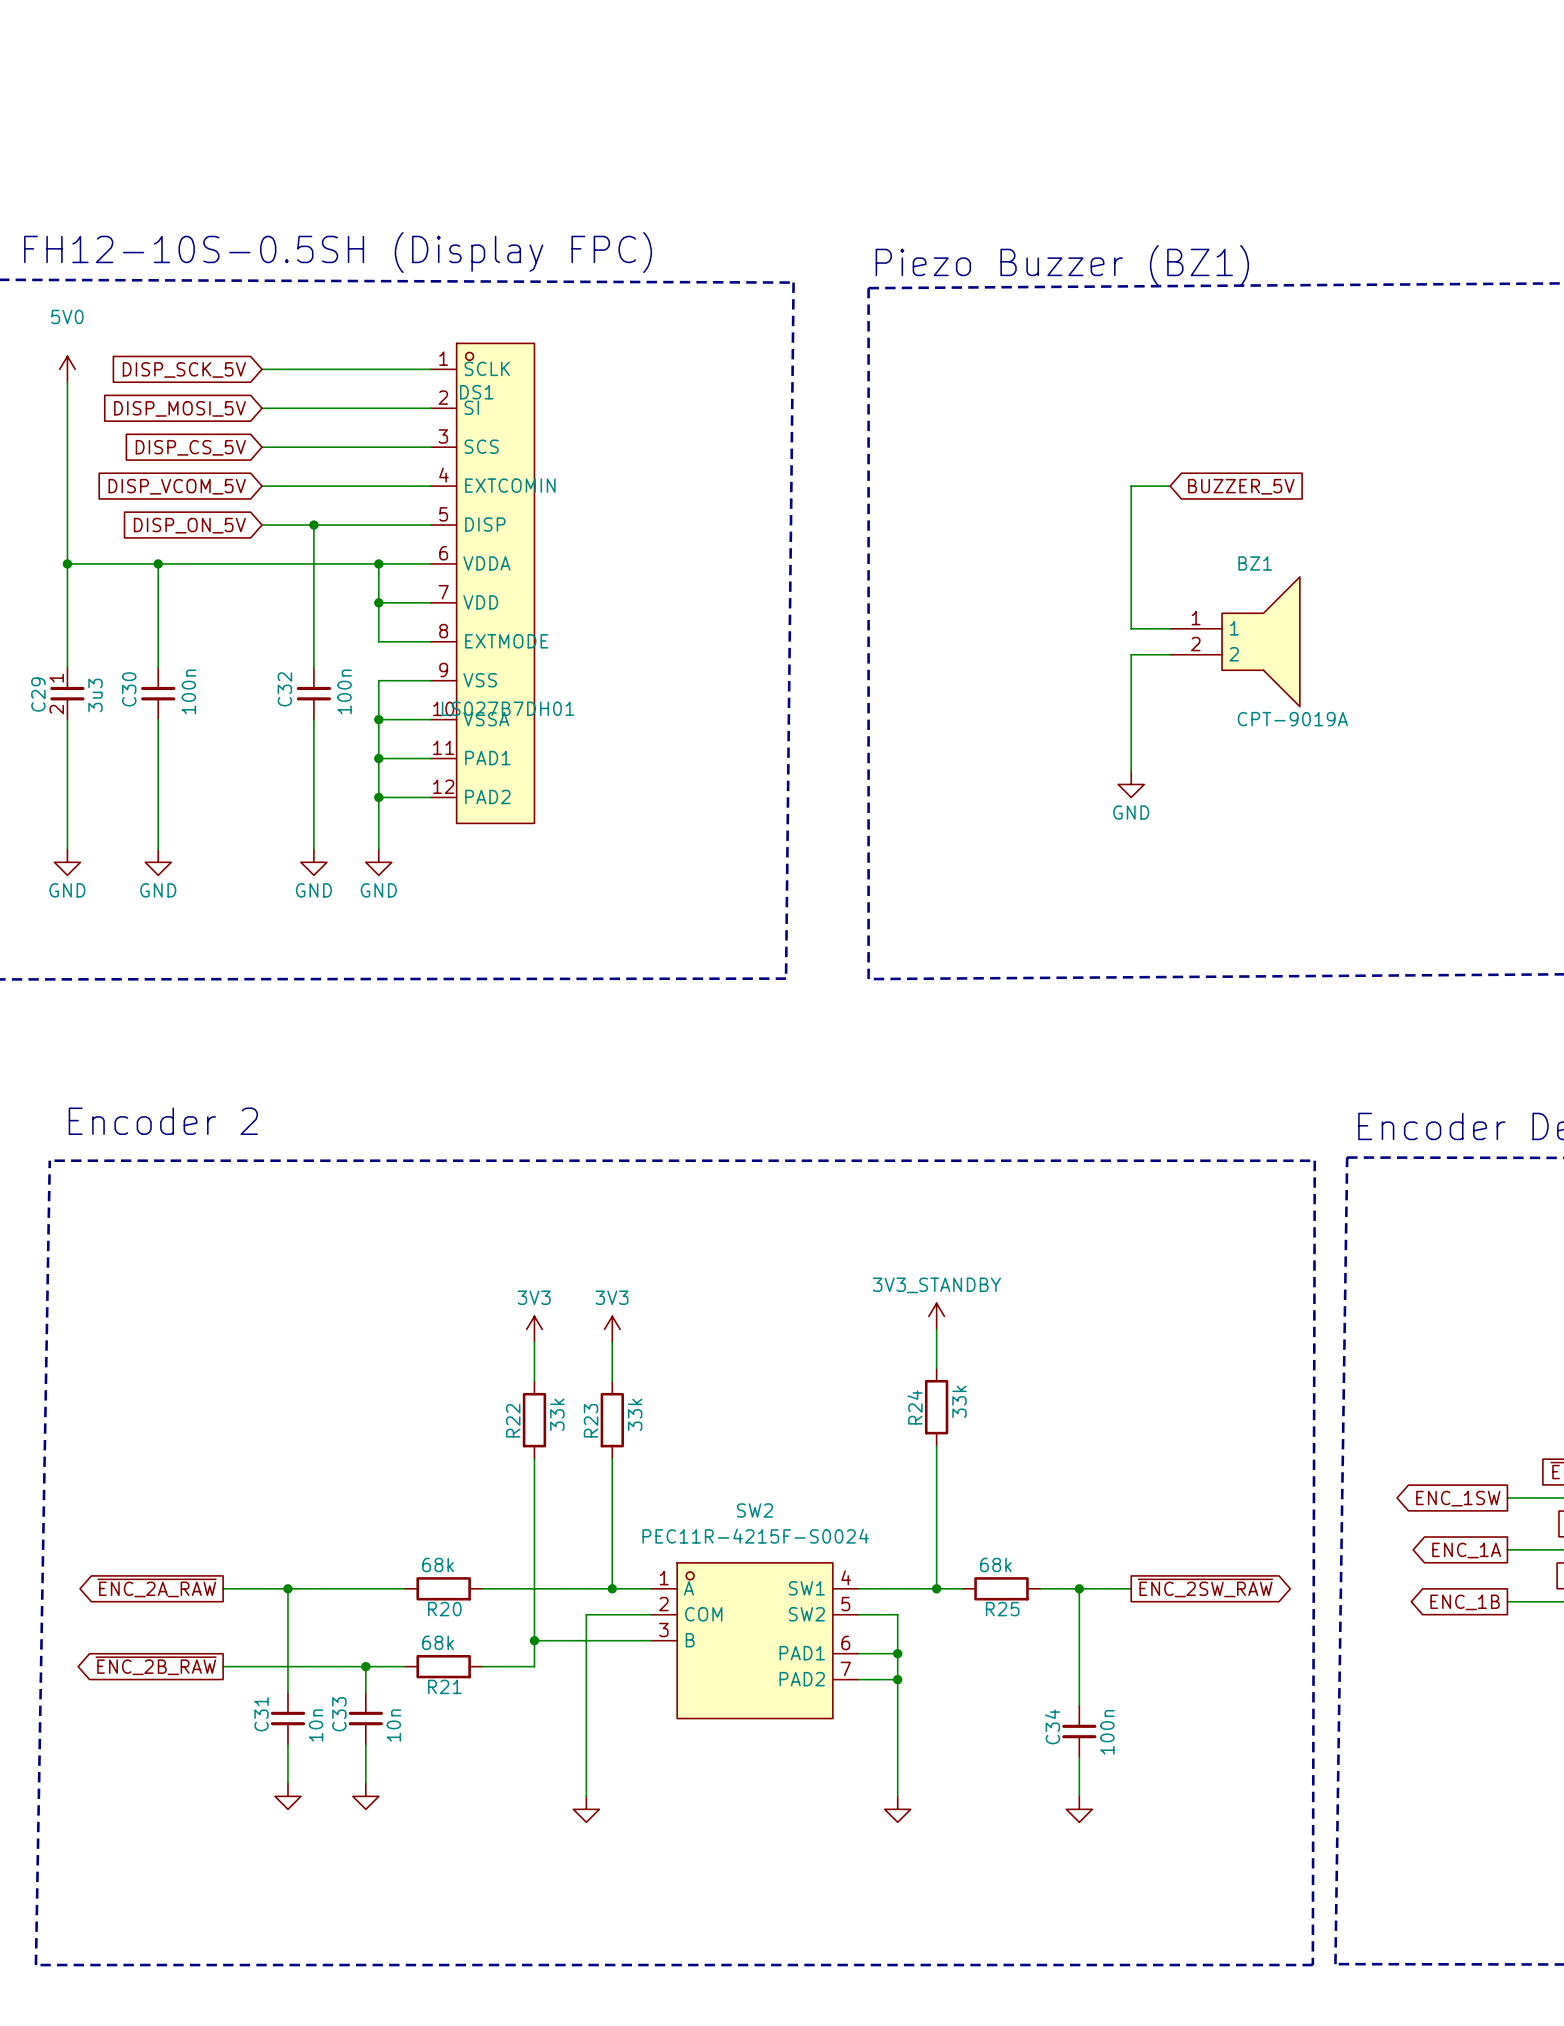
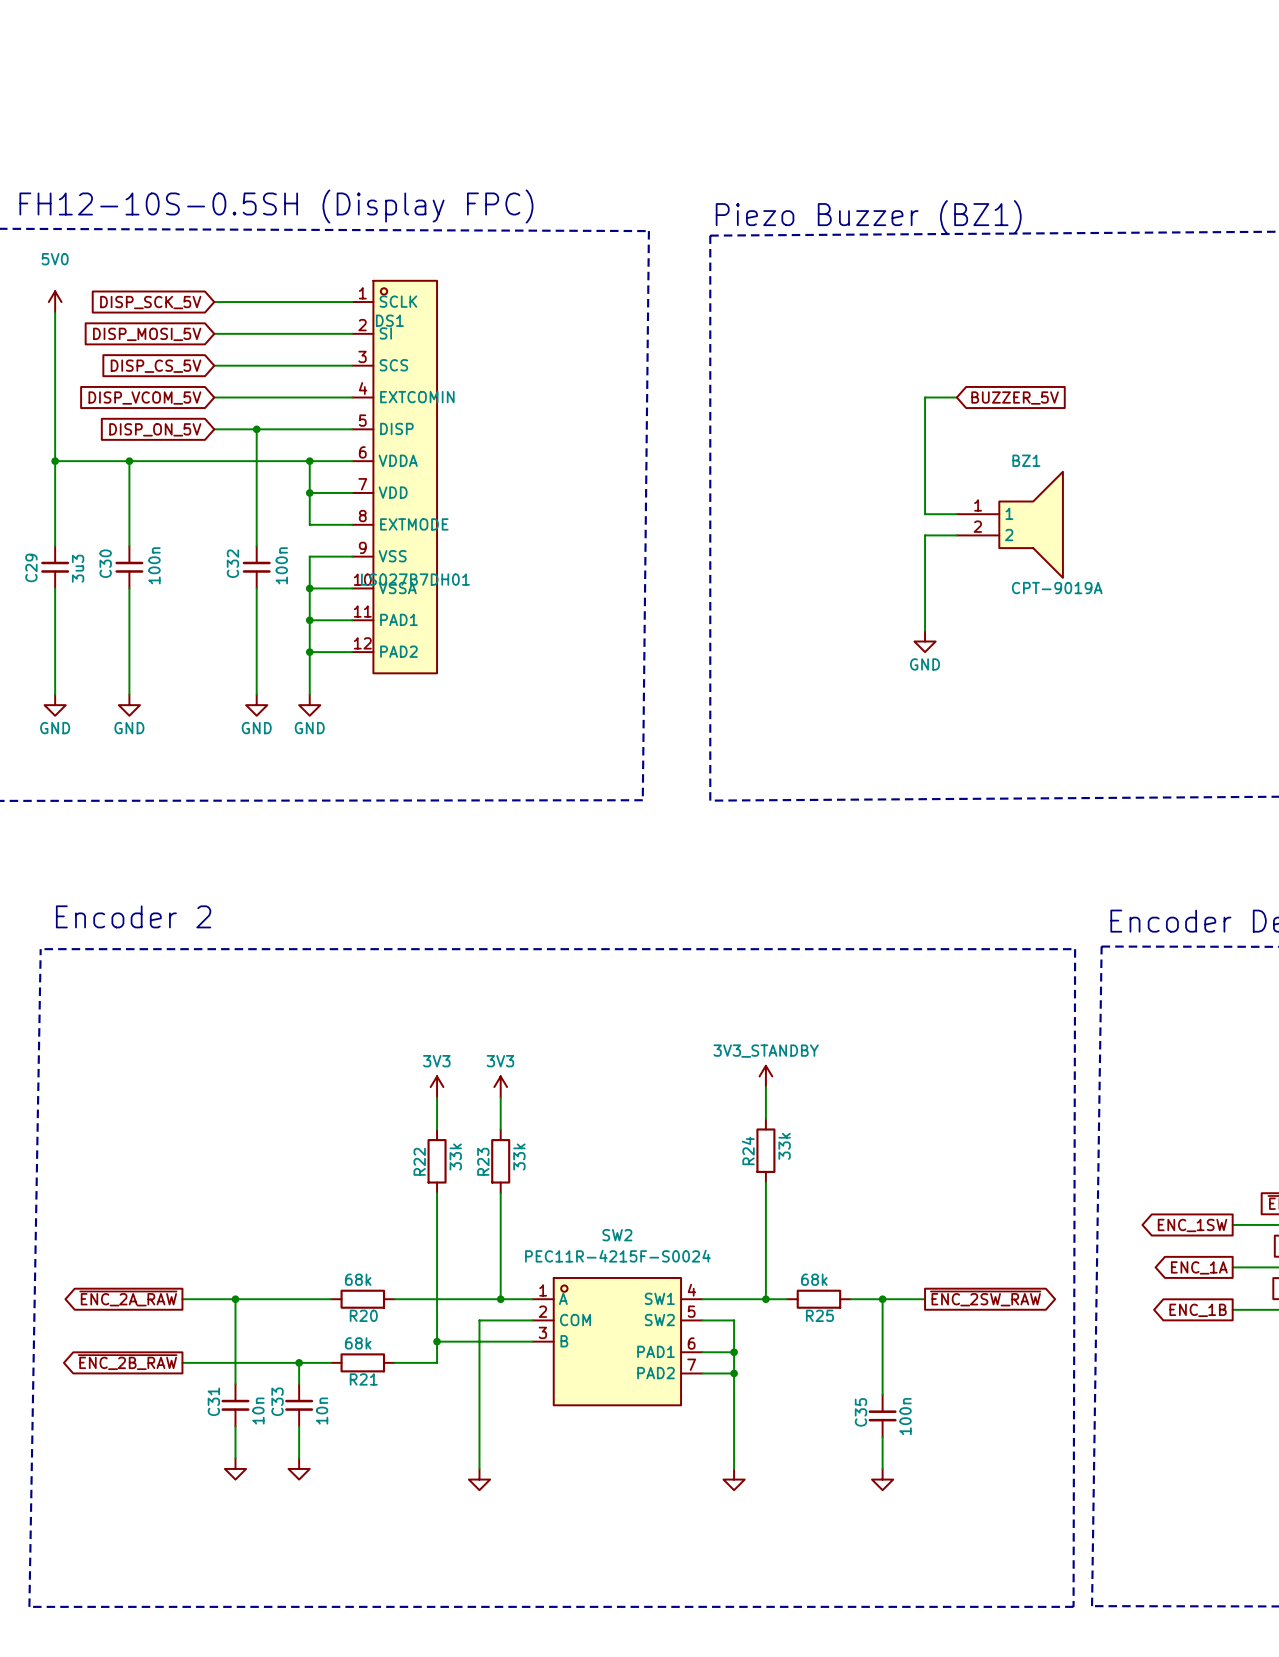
C29 pin number: 1 (56, 678) -> none
C29 pin number: 2 (56, 709) -> none
C34 name: C34 (1052, 1726) -> C35 (860, 1412)

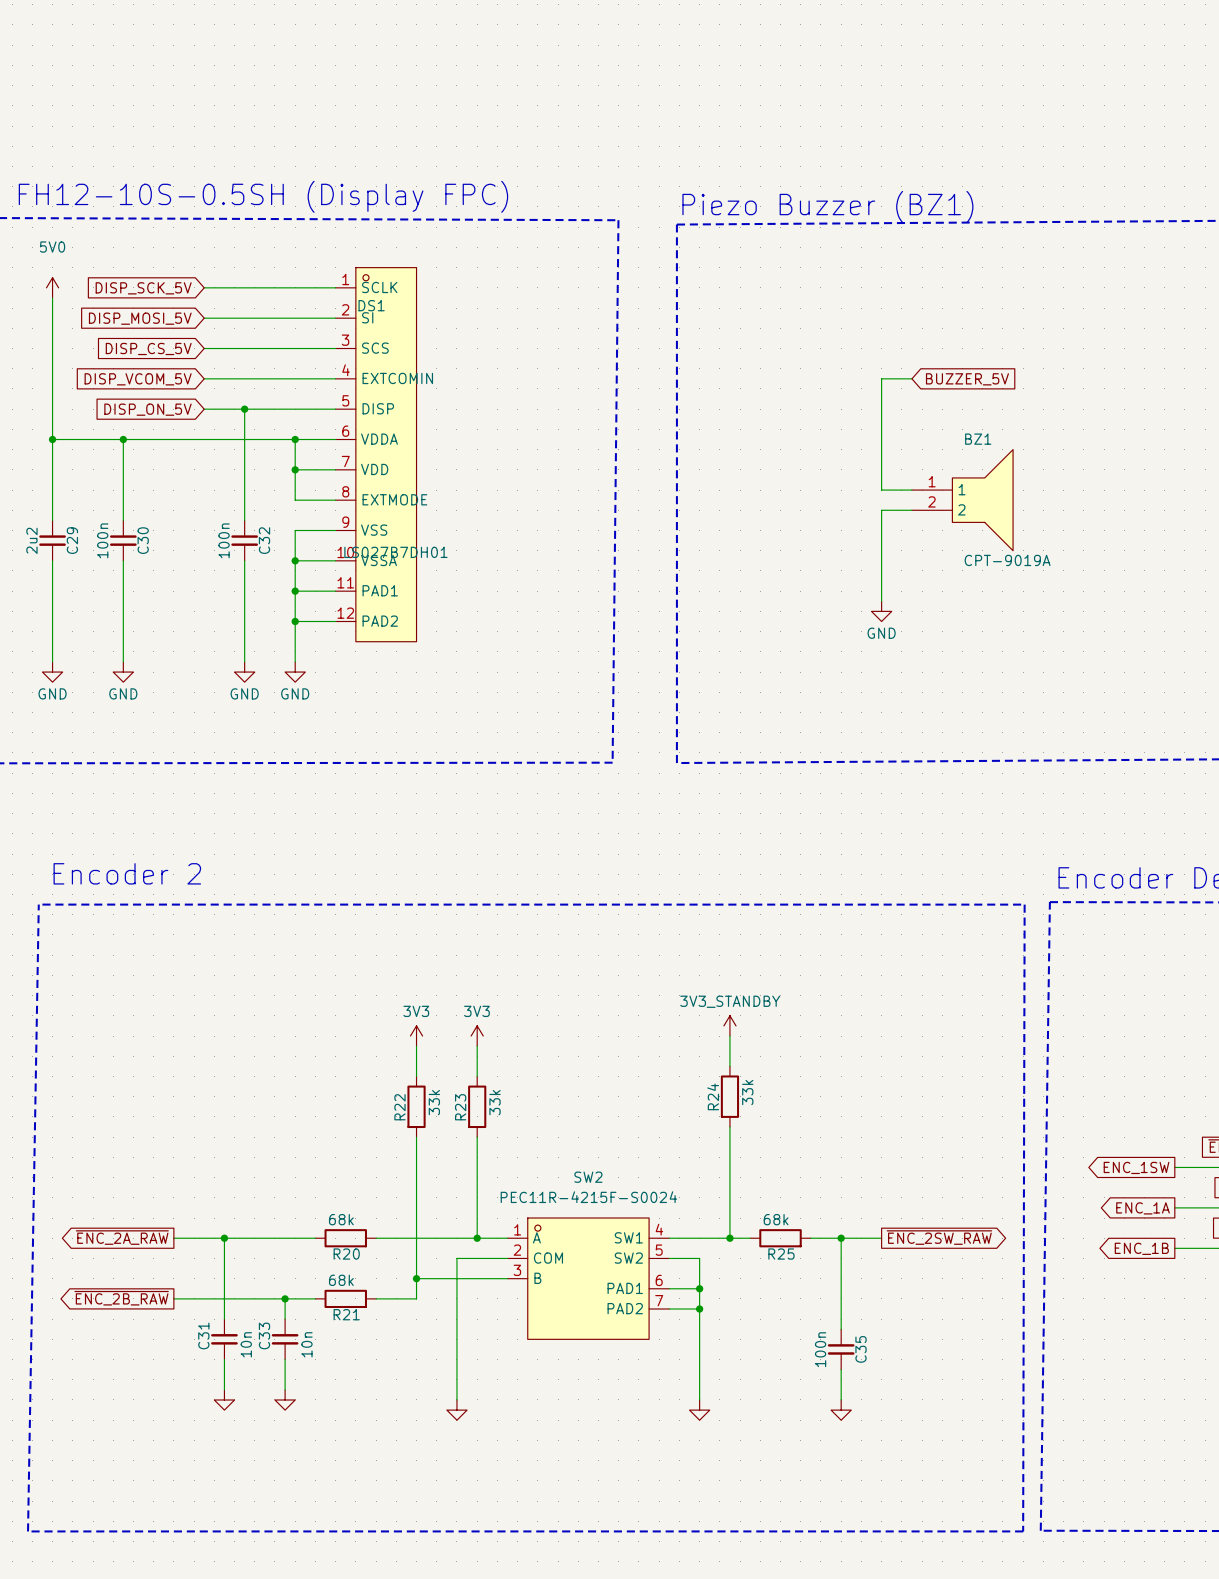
C30 name position: C30 (105, 563) -> C30 (143, 540)
C32 name position: C32 (232, 563) -> C32 (264, 540)
C30 value position: 100n (154, 565) -> 100n (102, 540)
C32 value position: 100n (281, 565) -> 100n (224, 540)
C29 name position: C29 (31, 567) -> C29 (72, 540)
C29 value: 3u3 (78, 568) -> 2u2 (31, 540)
C35 name position: C35 (860, 1412) -> C35 (861, 1349)
C35 value position: 100n (905, 1416) -> 100n (820, 1349)

